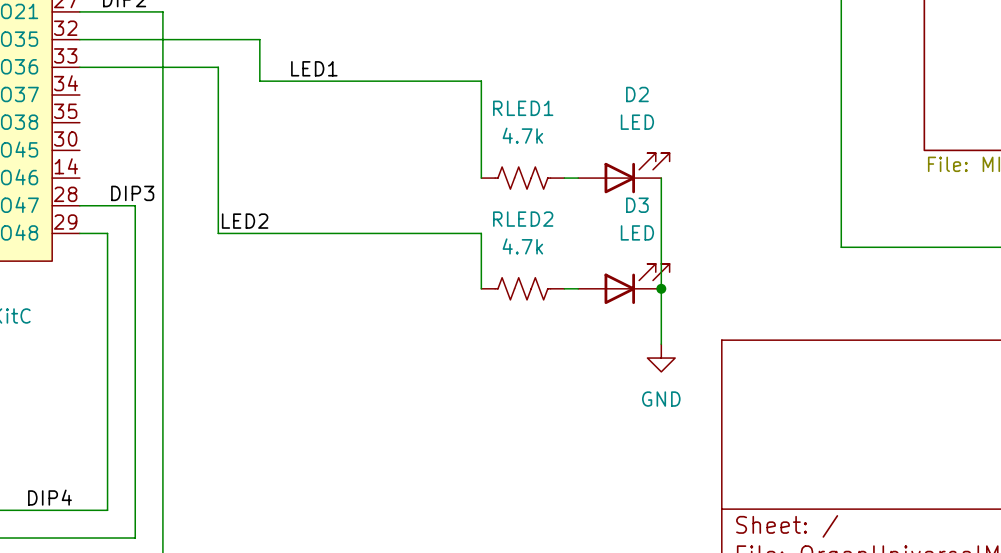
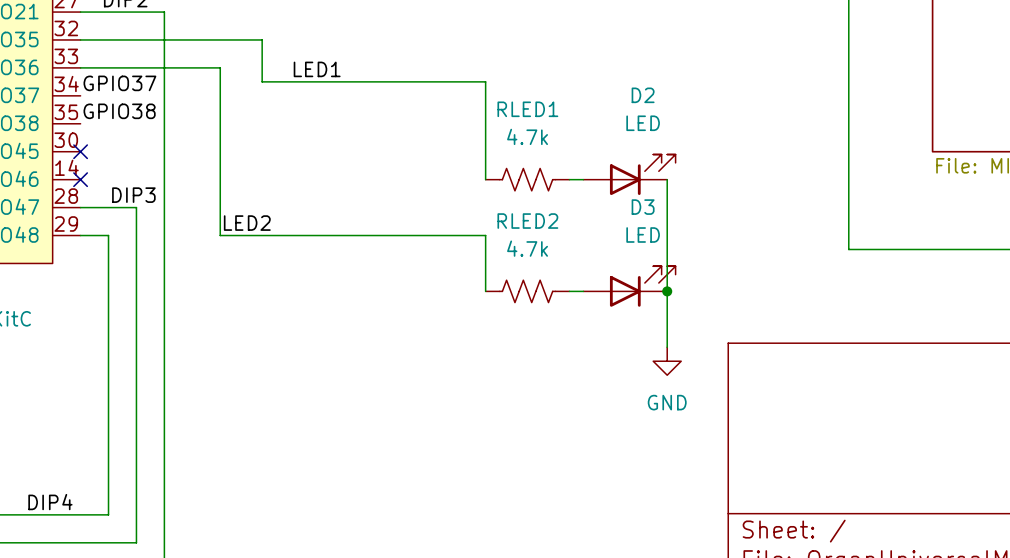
label: none -> GPIO37 (119, 83)
label: none -> GPIO38 (119, 111)
no-connect mark: none -> (80, 151)
no-connect mark: none -> (80, 179)

